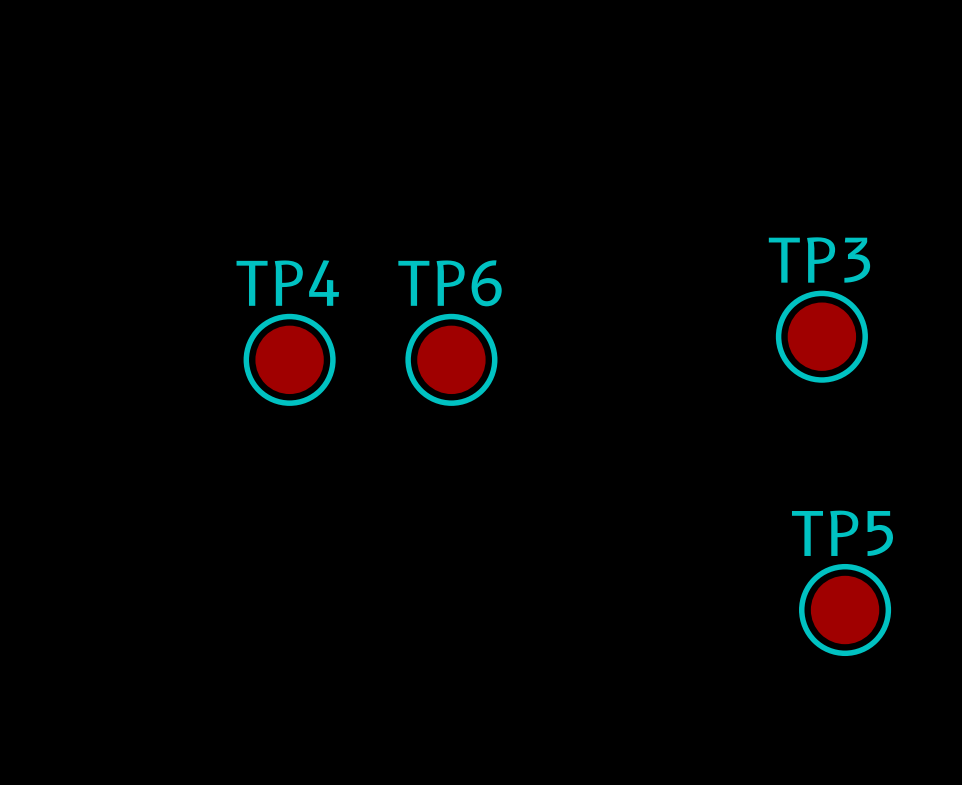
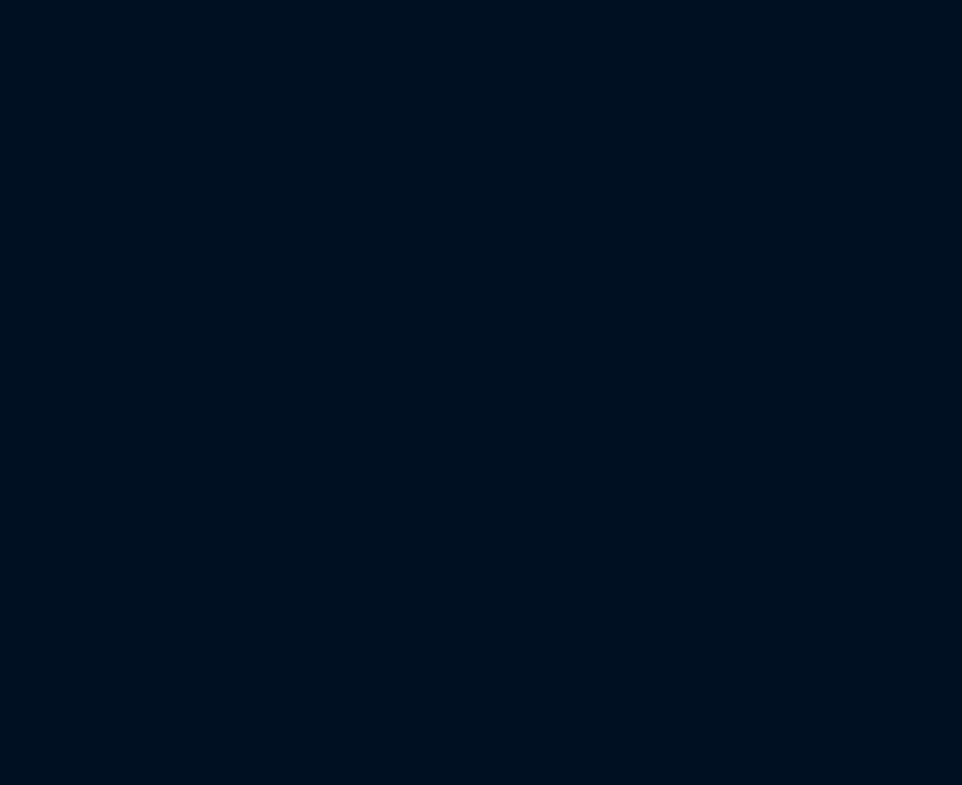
TP3: (821, 336) -> none
TP4: (289, 359) -> none
TP6: (451, 359) -> none
TP5: (845, 609) -> none

